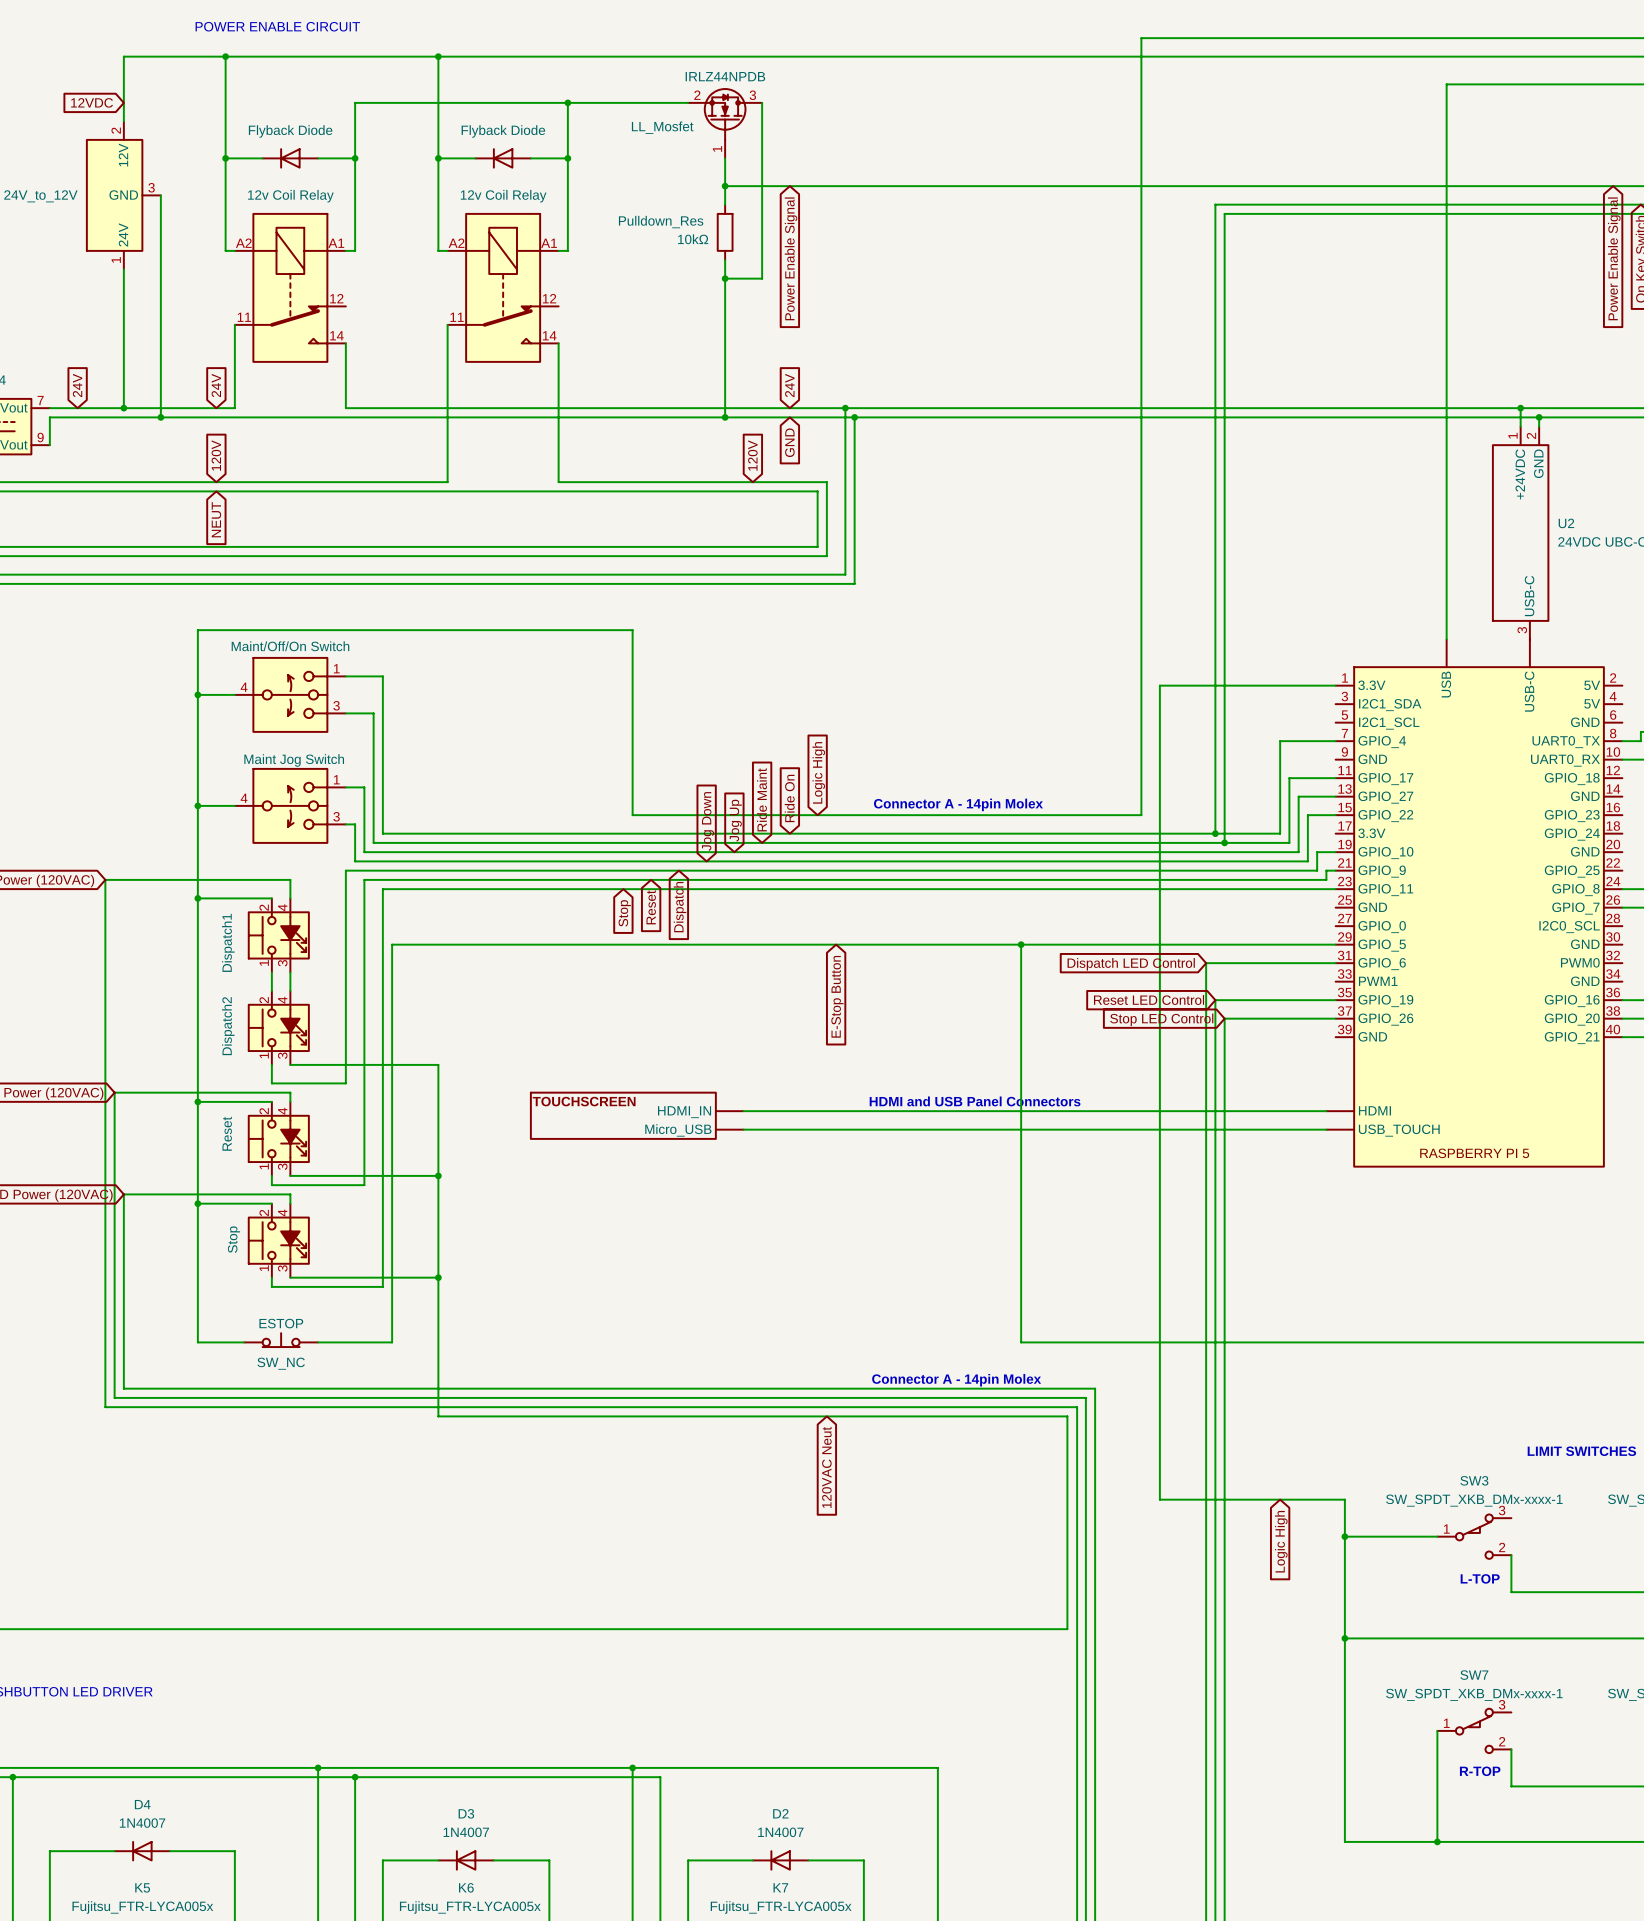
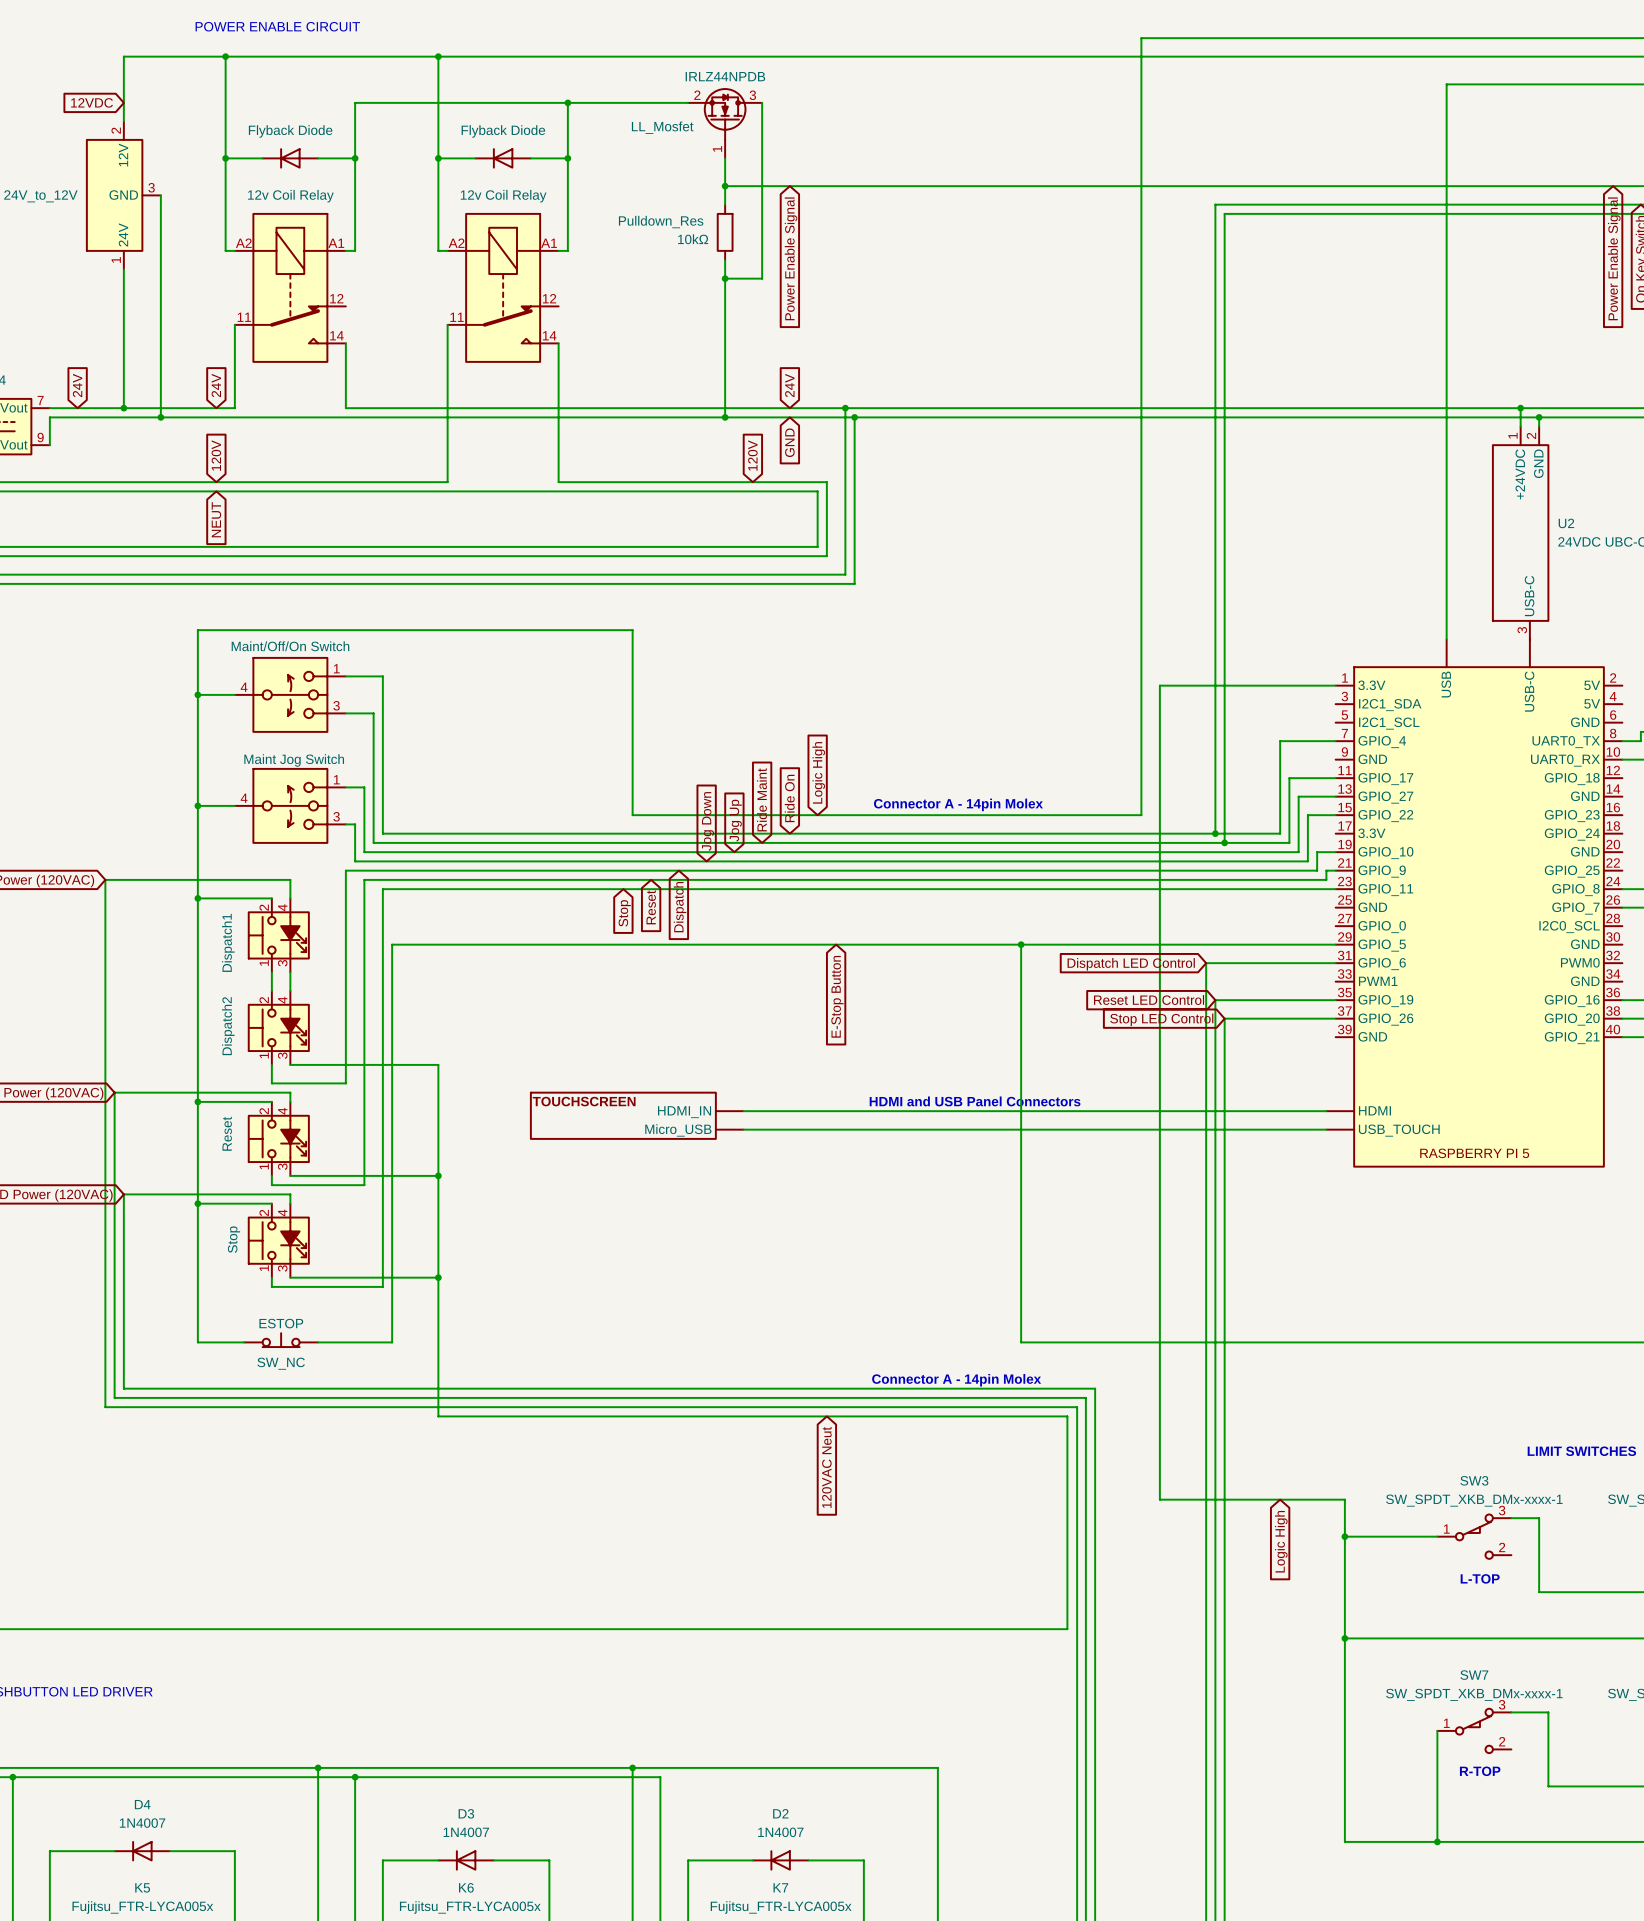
wire: (1511, 1555) (1511, 1592) (1539, 1592) -> (1511, 1518) (1539, 1518) (1539, 1592)
wire: (1511, 1749) (1511, 1786) (1548, 1786) -> (1511, 1712) (1548, 1712) (1548, 1786)

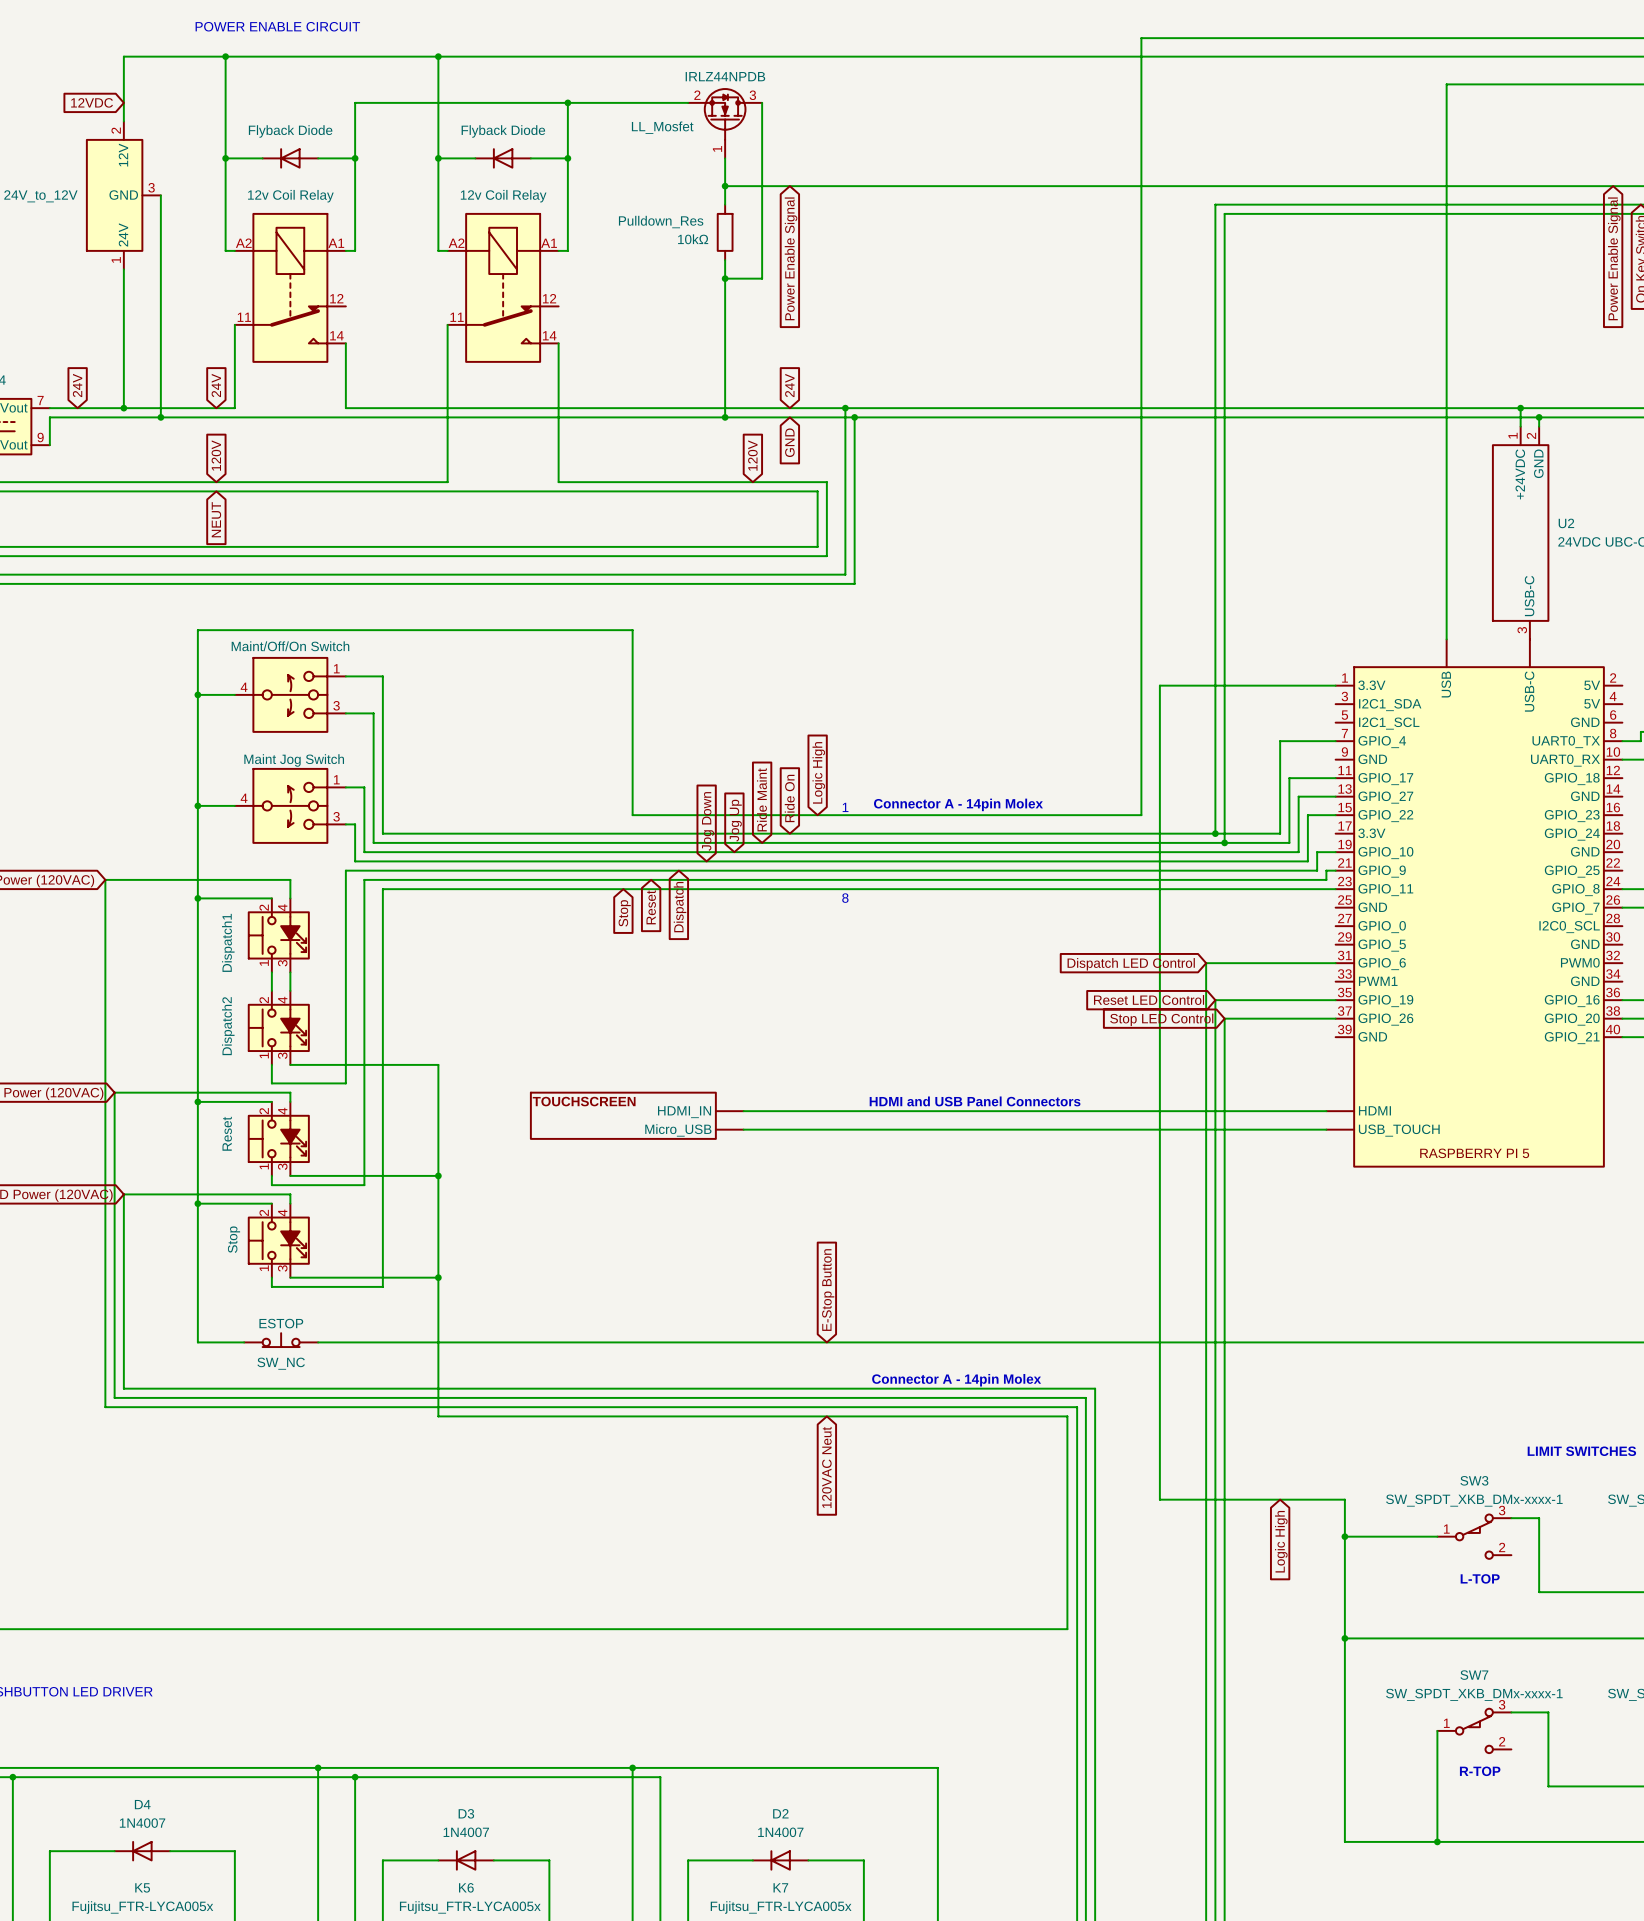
text: none -> 1 (845, 807)
text: none -> 8 (845, 898)
wire: (1021, 944) (1021, 1342) -> none
junction: (1021, 944) -> none
wire: (1335, 944) (392, 944) (392, 1342) -> (1021, 1342) (392, 1342)
global label: E-Stop Button (837, 996) -> none
global label: none -> E-Stop Button (828, 1290)

